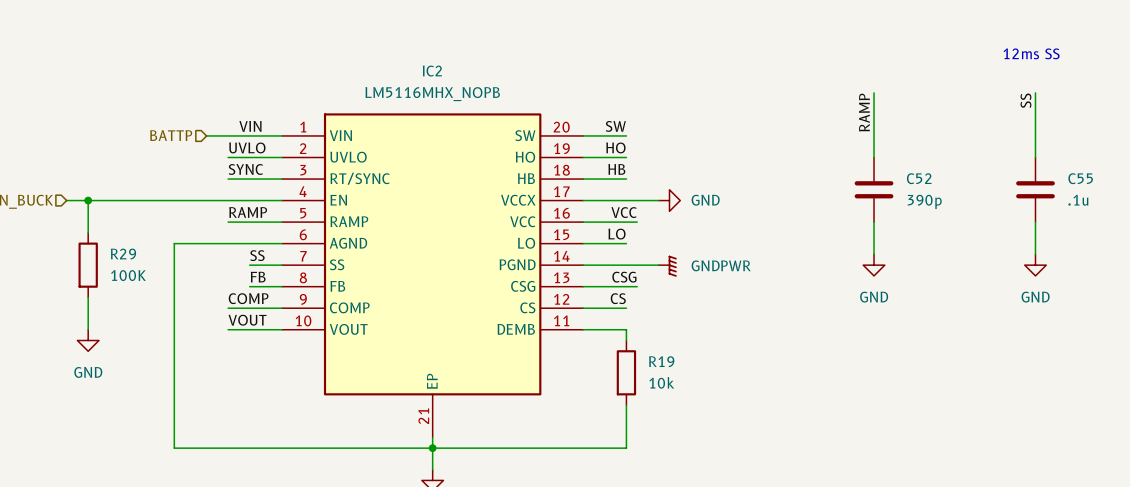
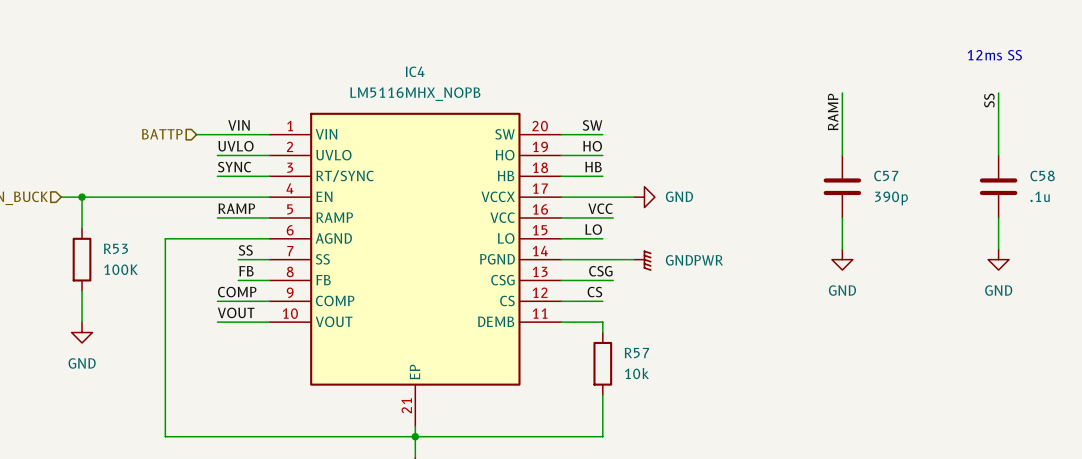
IC2 name: IC2 (432, 71) -> IC4 (415, 71)
C52 name: C52 (919, 178) -> C57 (886, 175)
C55 name: C55 (1080, 178) -> C58 (1042, 175)
R29 name: R29 (123, 254) -> R53 (115, 248)
R19 name: R19 (661, 361) -> R57 (636, 353)

